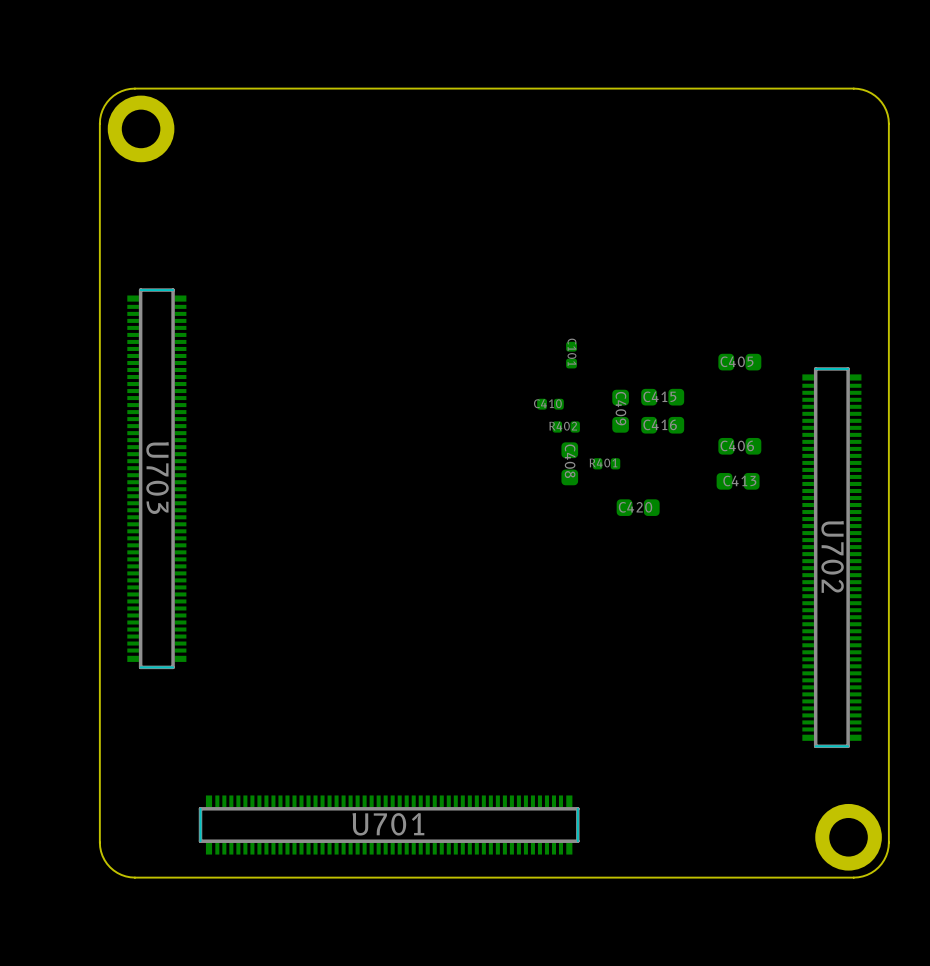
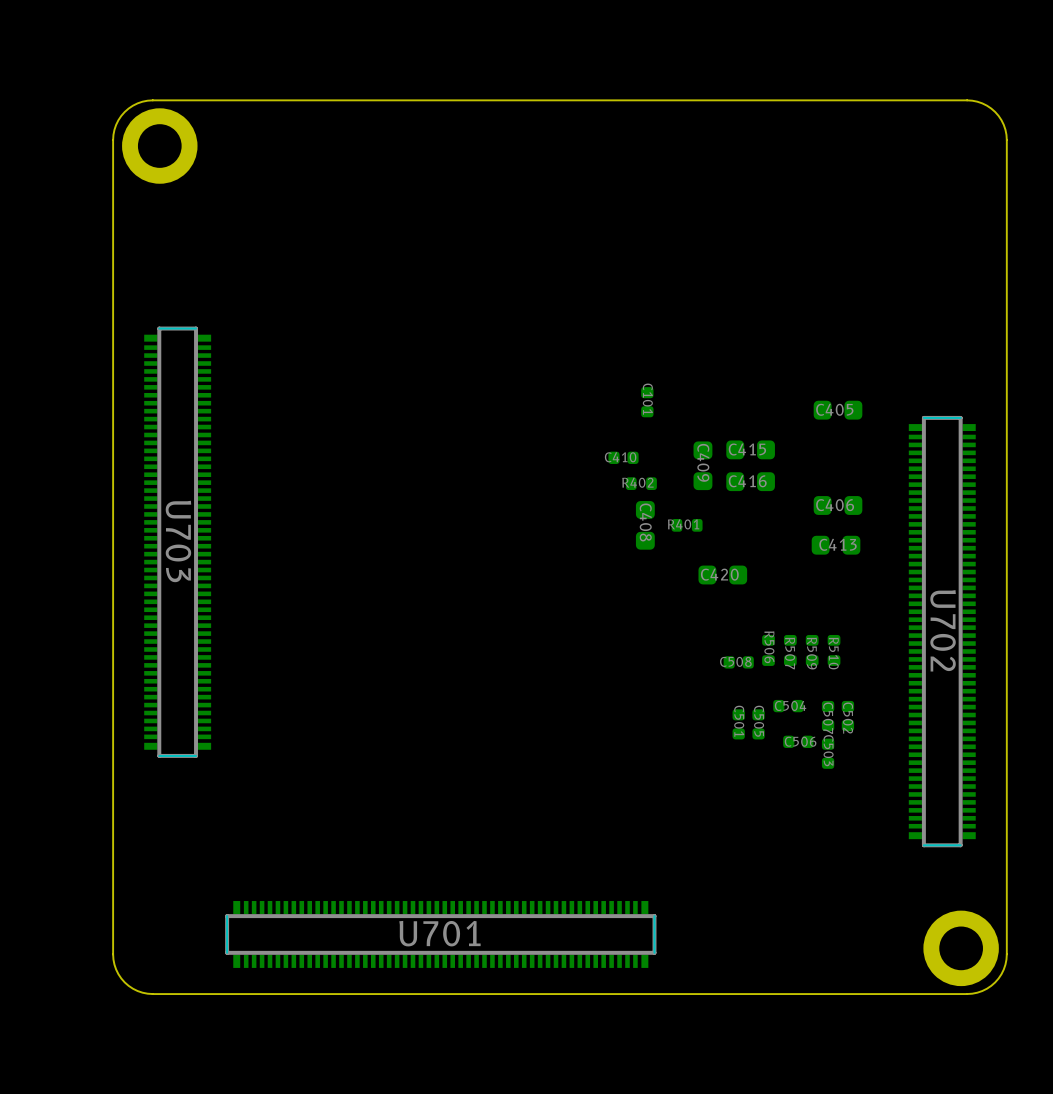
R506: none -> (768, 650)
R507: none -> (790, 650)
R509: none -> (812, 650)
R510: none -> (834, 650)
C508: none -> (738, 662)
C504: none -> (788, 706)
C507: none -> (828, 716)
C502: none -> (847, 716)
C501: none -> (738, 724)
C505: none -> (758, 724)
C506: none -> (798, 741)
C503: none -> (828, 753)

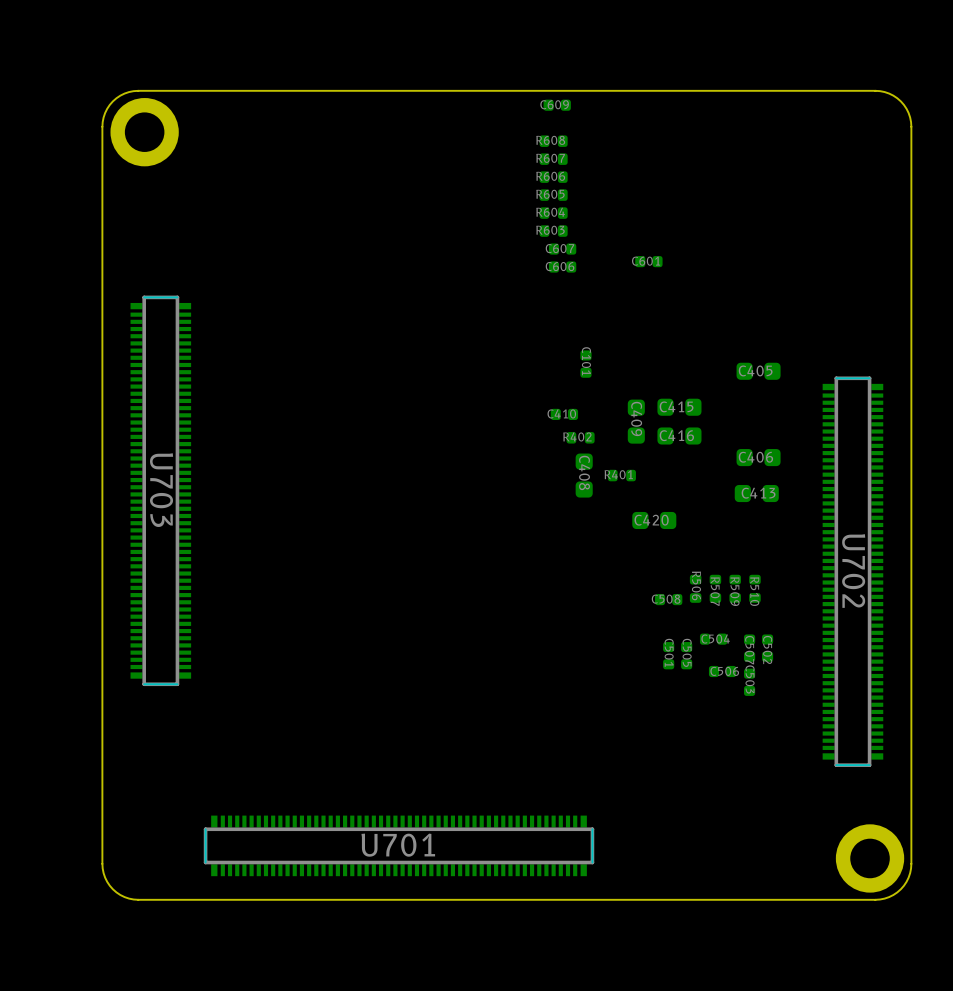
C609: none -> (557, 105)
R608: none -> (553, 141)
R607: none -> (553, 159)
R606: none -> (553, 177)
R605: none -> (553, 195)
R604: none -> (553, 213)
R603: none -> (553, 231)
C607: none -> (562, 249)
C601: none -> (648, 261)
C606: none -> (562, 267)

